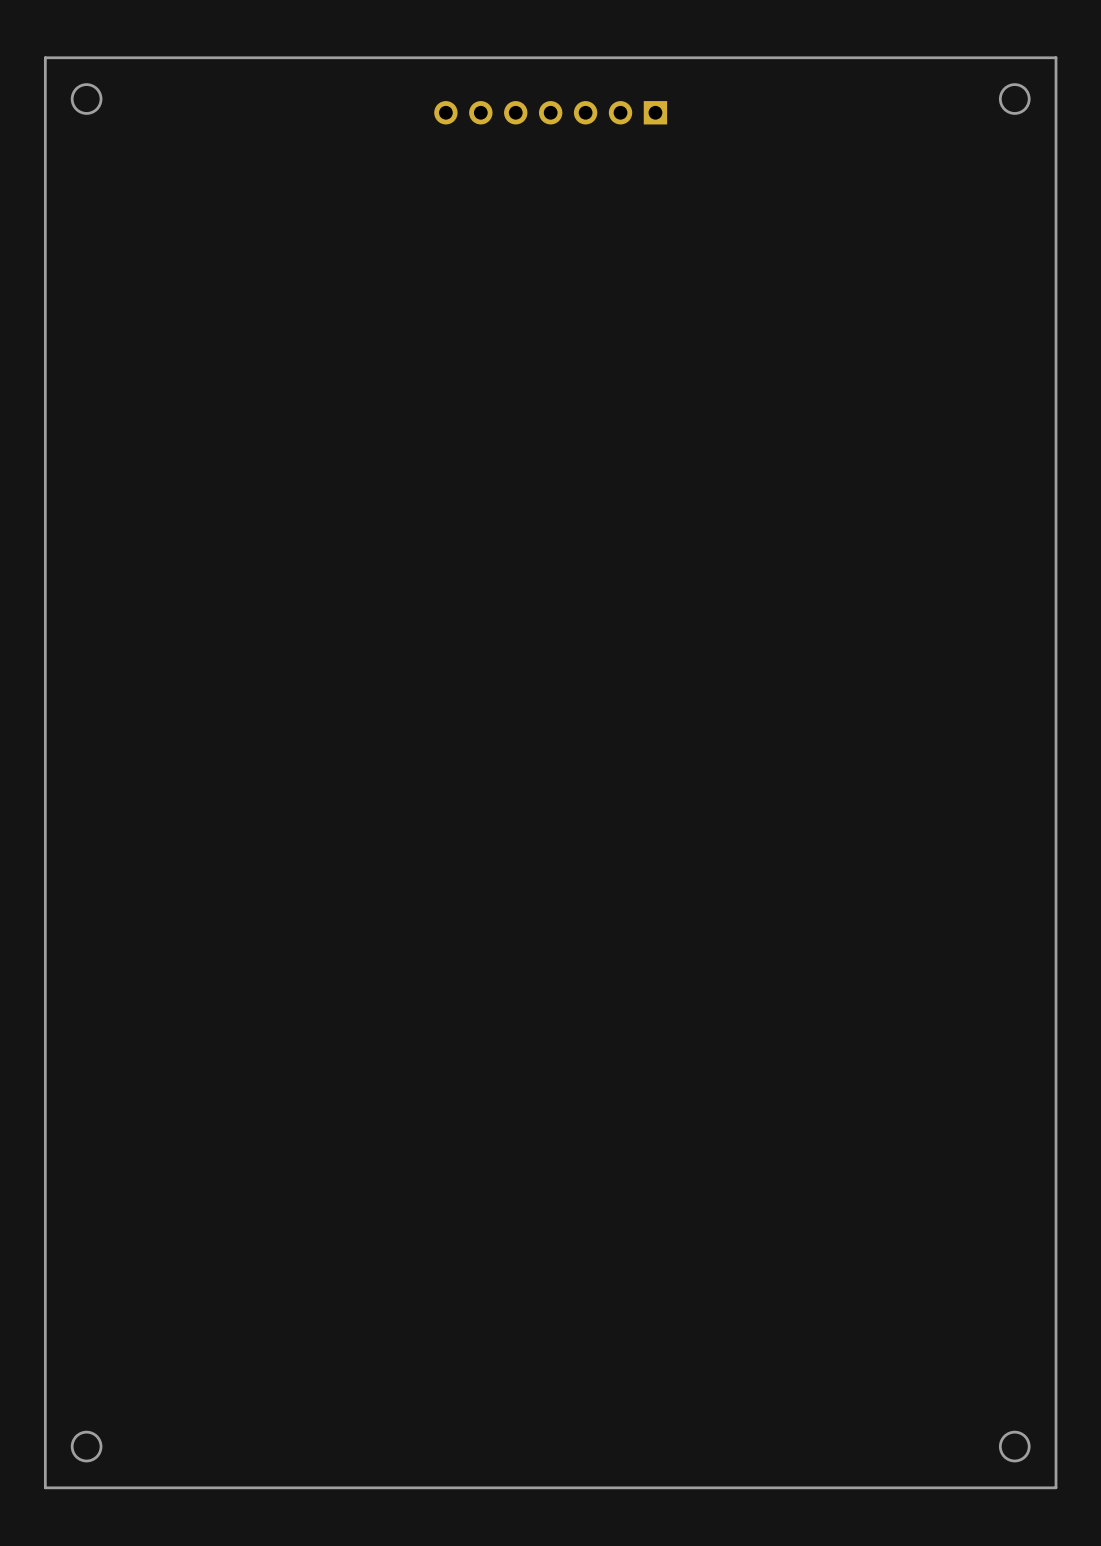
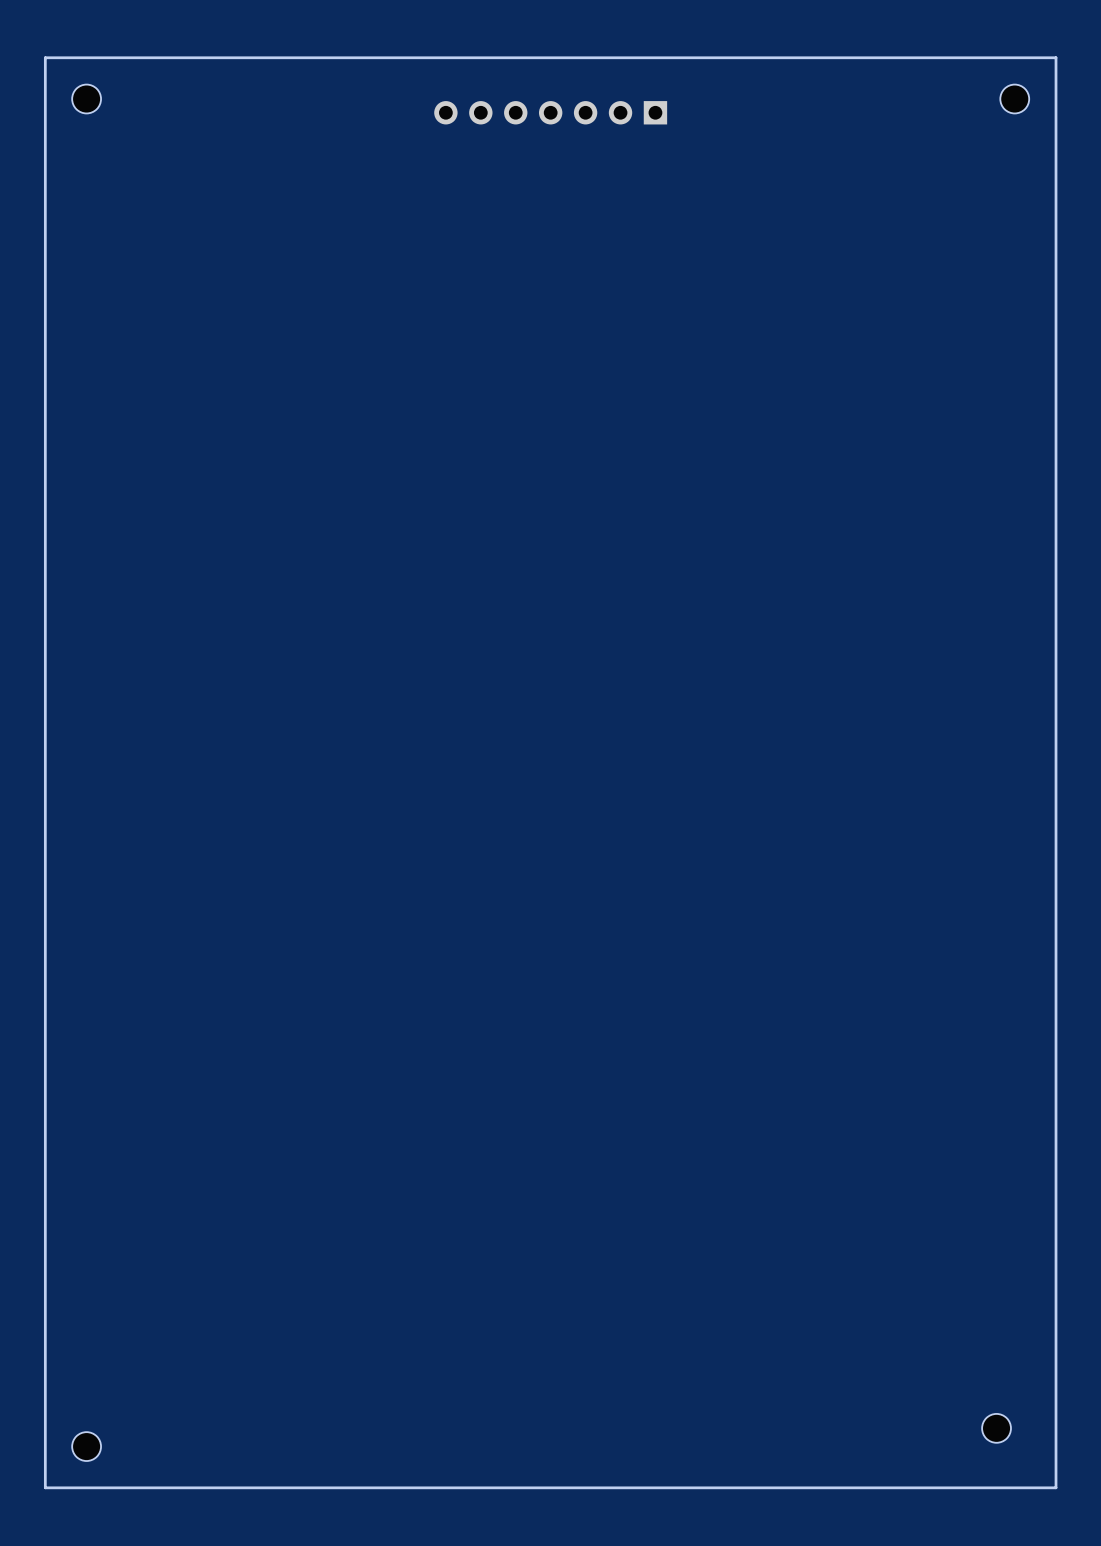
round board edge: [70, 83, 103, 115] -> none
round board edge: [998, 83, 1031, 115] -> none
part: none -> (86, 99)
part: none -> (1014, 99)
part: none -> (996, 1428)
round board edge: [70, 1430, 103, 1463] -> none
round board edge: [998, 1430, 1031, 1463] -> none
part: none -> (86, 1446)

